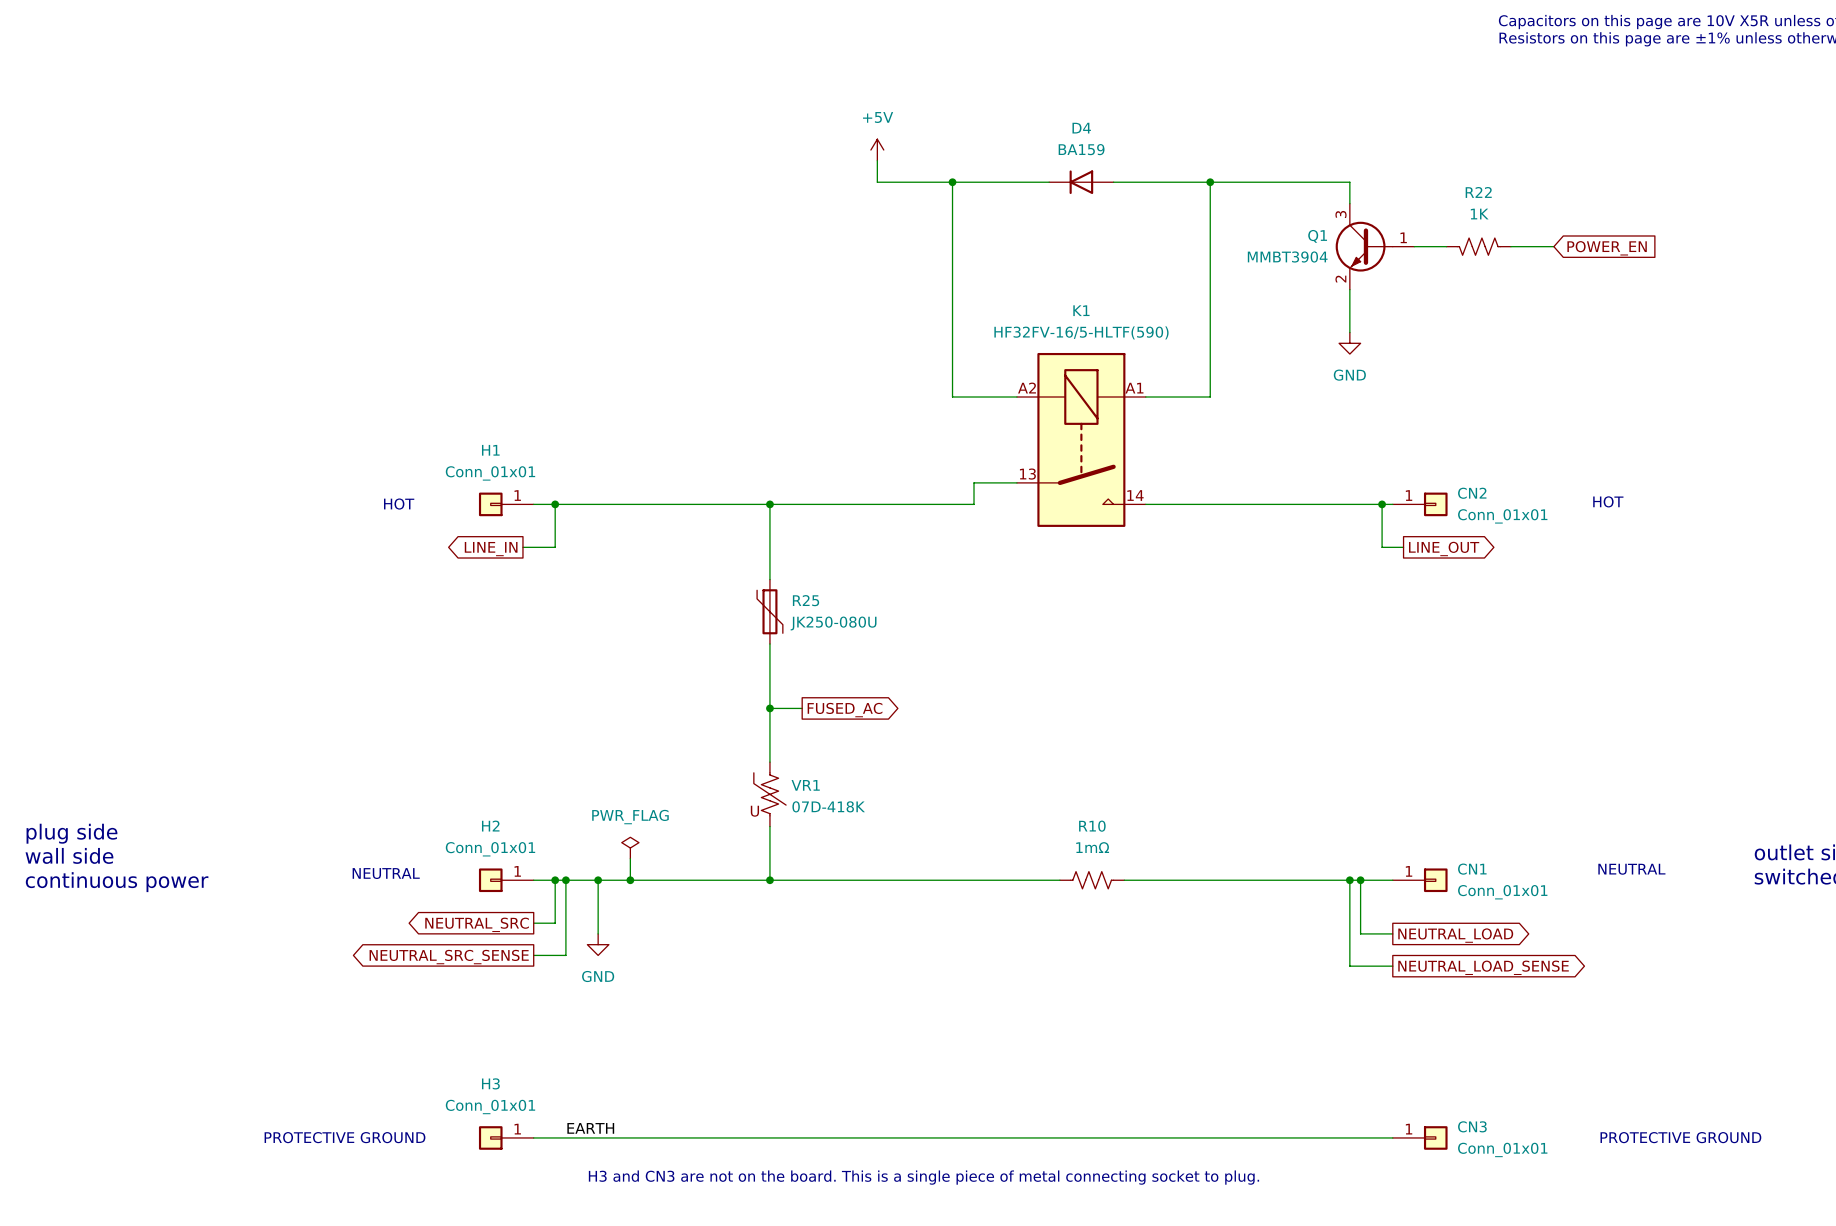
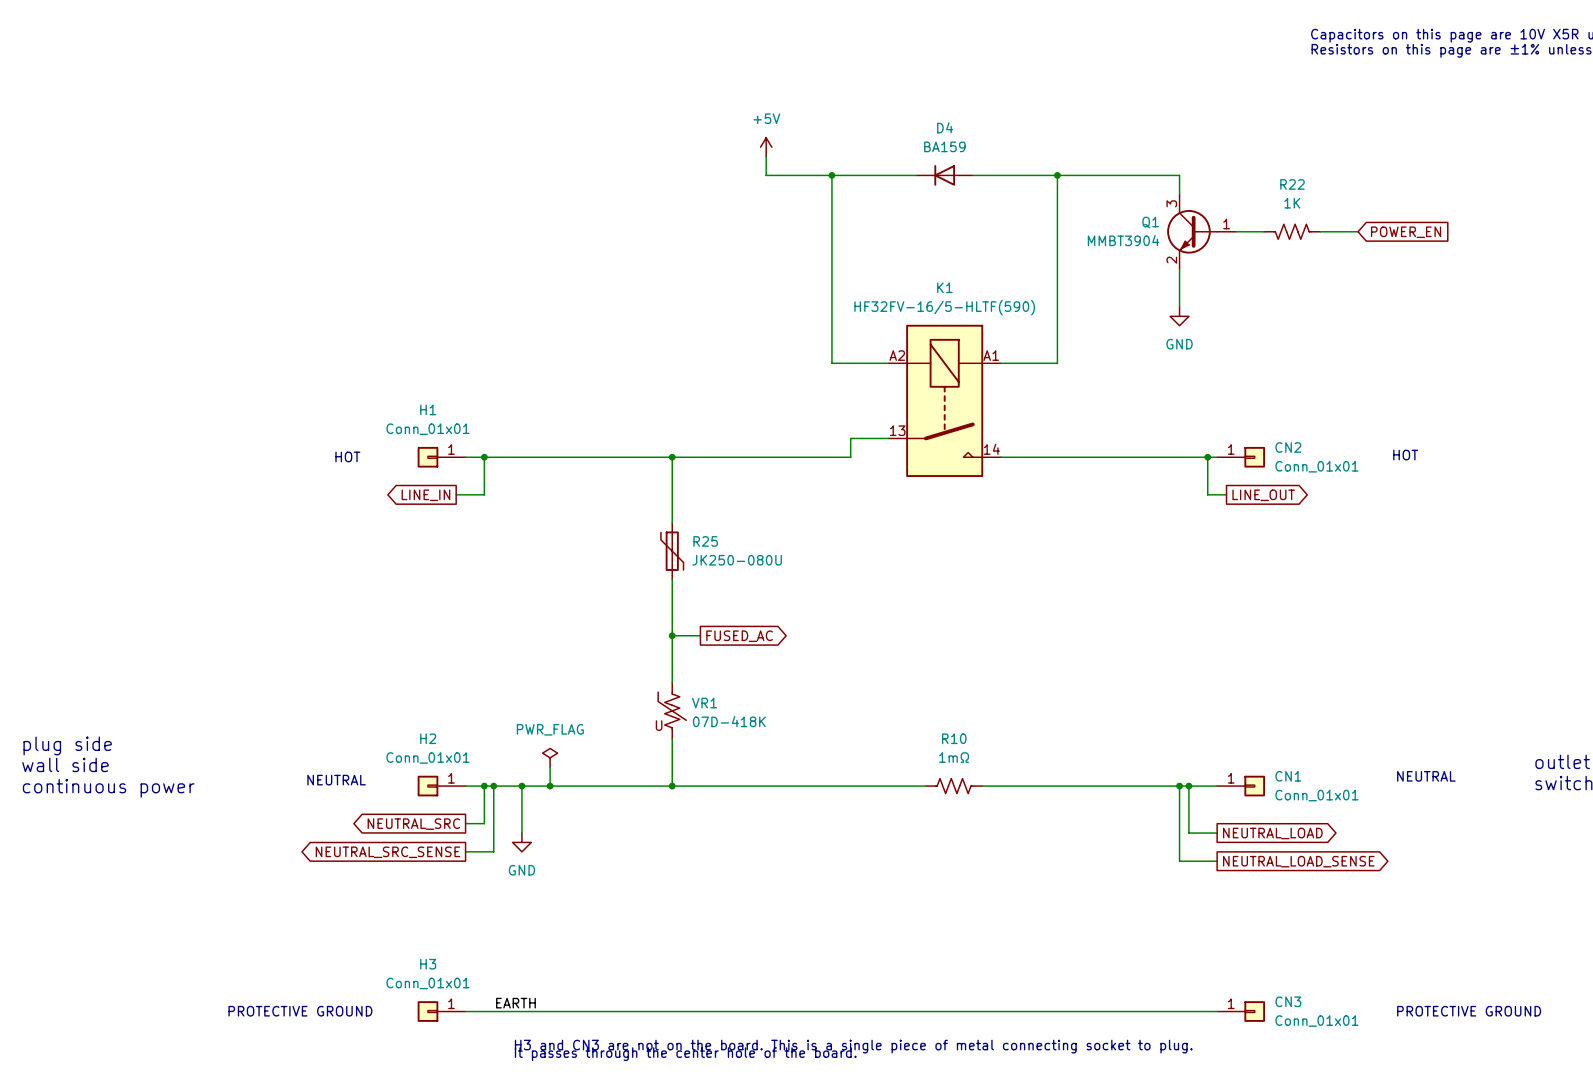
text: none -> It passes through the center hole of the board. (685, 1054)

